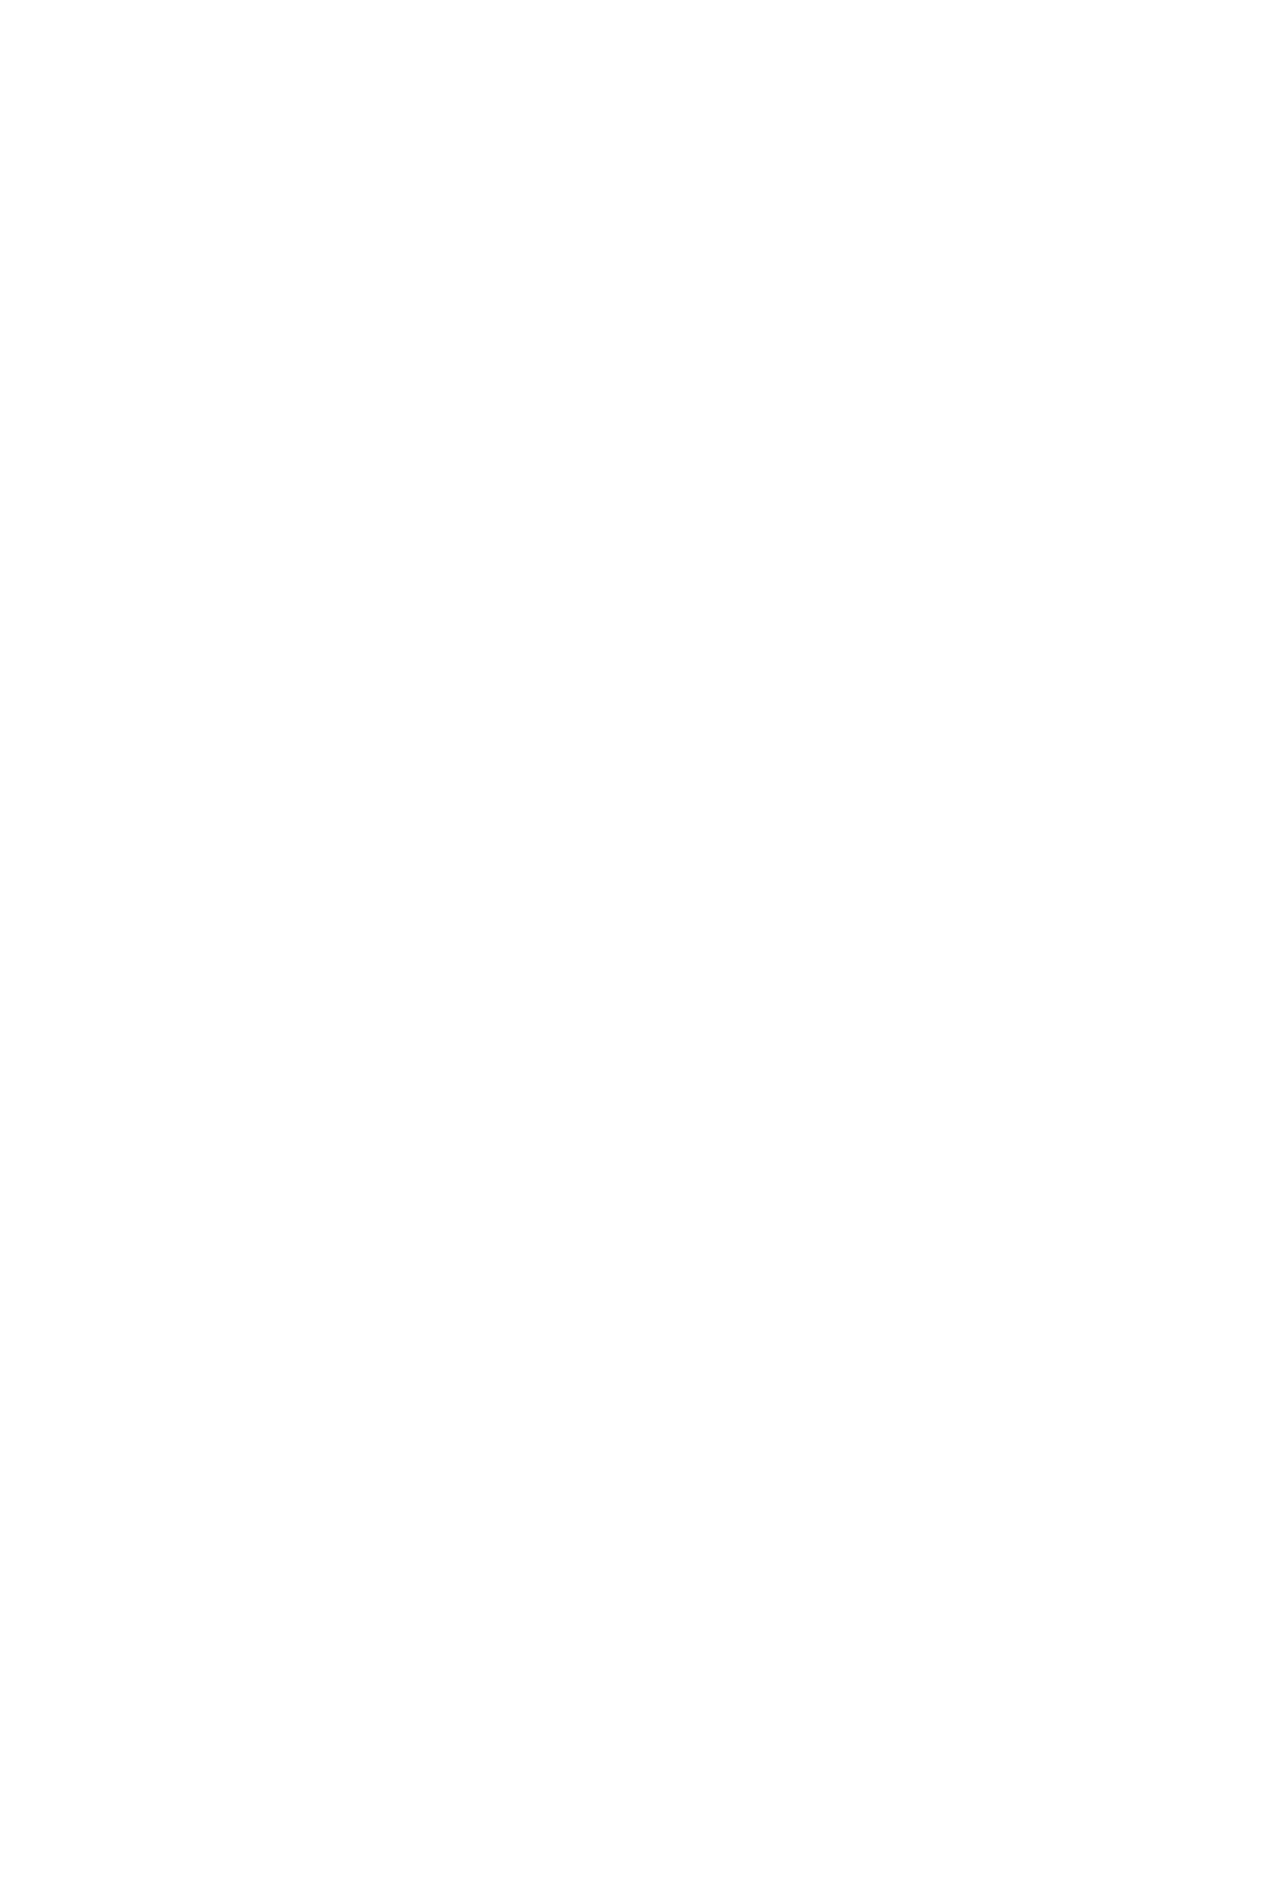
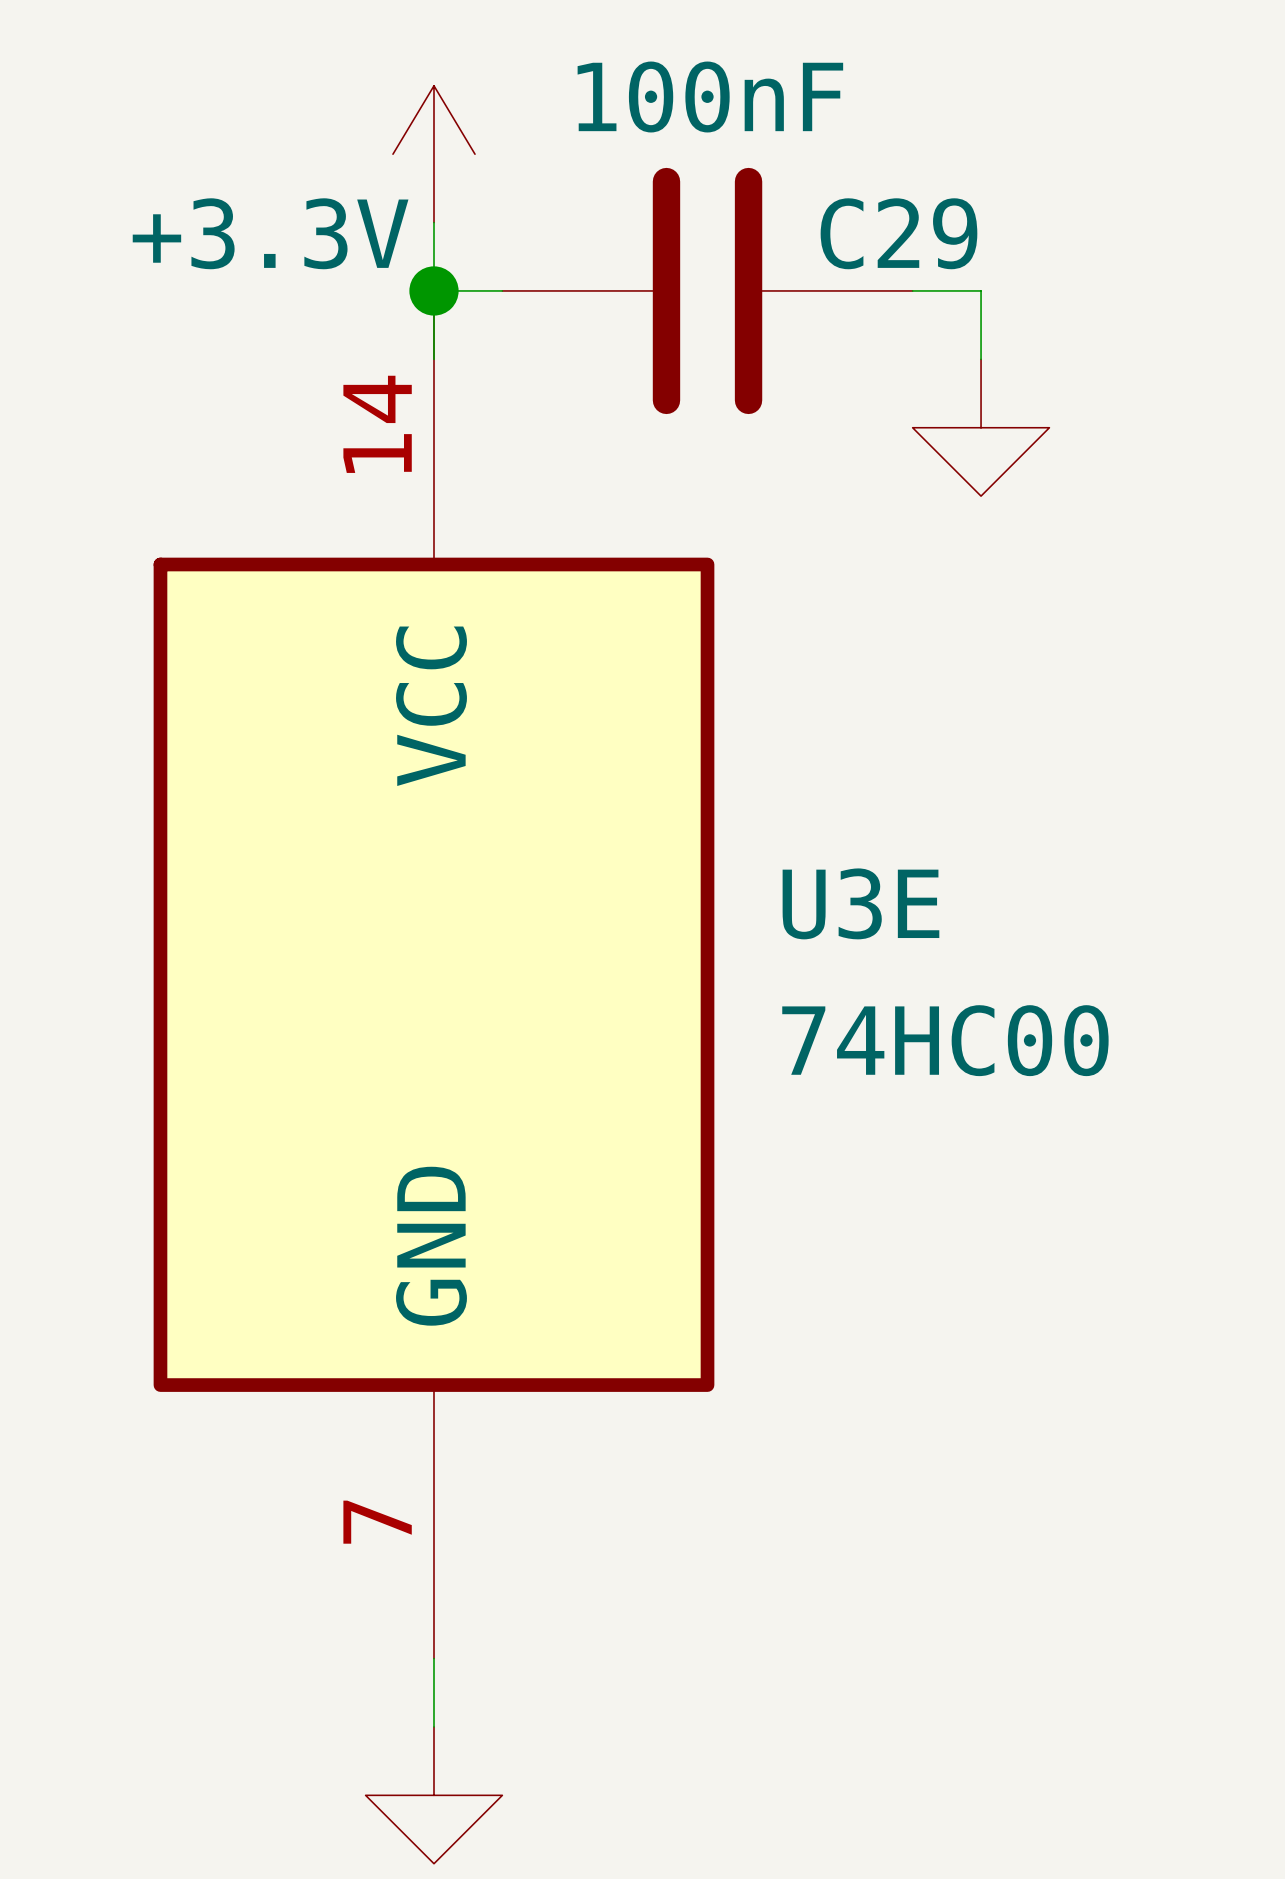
power symbol: none -> +3.3V (433, 154)
wire: none -> (433, 222) (433, 359)
wire: none -> (433, 290) (502, 290)
junction: none -> (433, 290)
C29: none -> 100nF (707, 290)
wire: none -> (912, 290) (981, 290) (981, 359)
power symbol: none -> (981, 427)
U3E: none -> 74HC00 (433, 974)
wire: none -> (433, 1658) (433, 1726)
power symbol: none -> (433, 1795)

